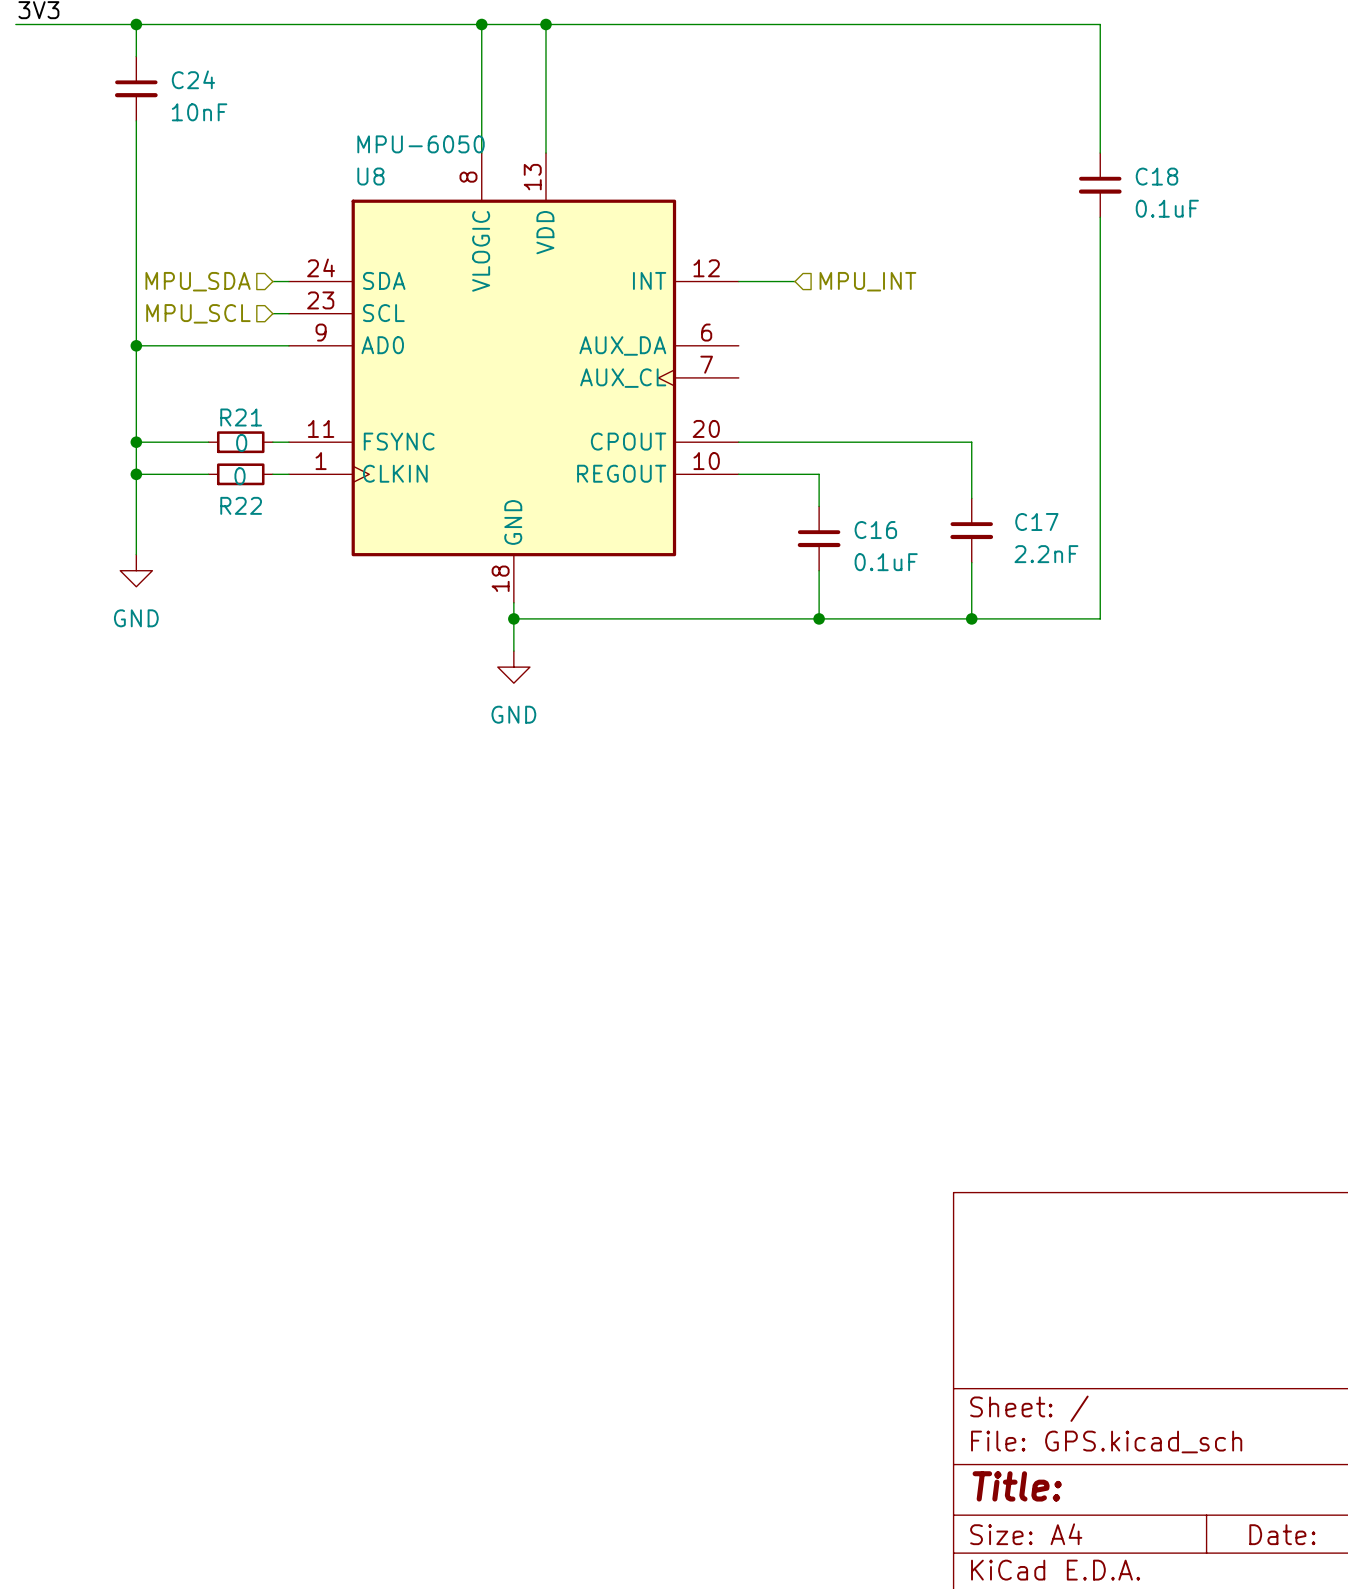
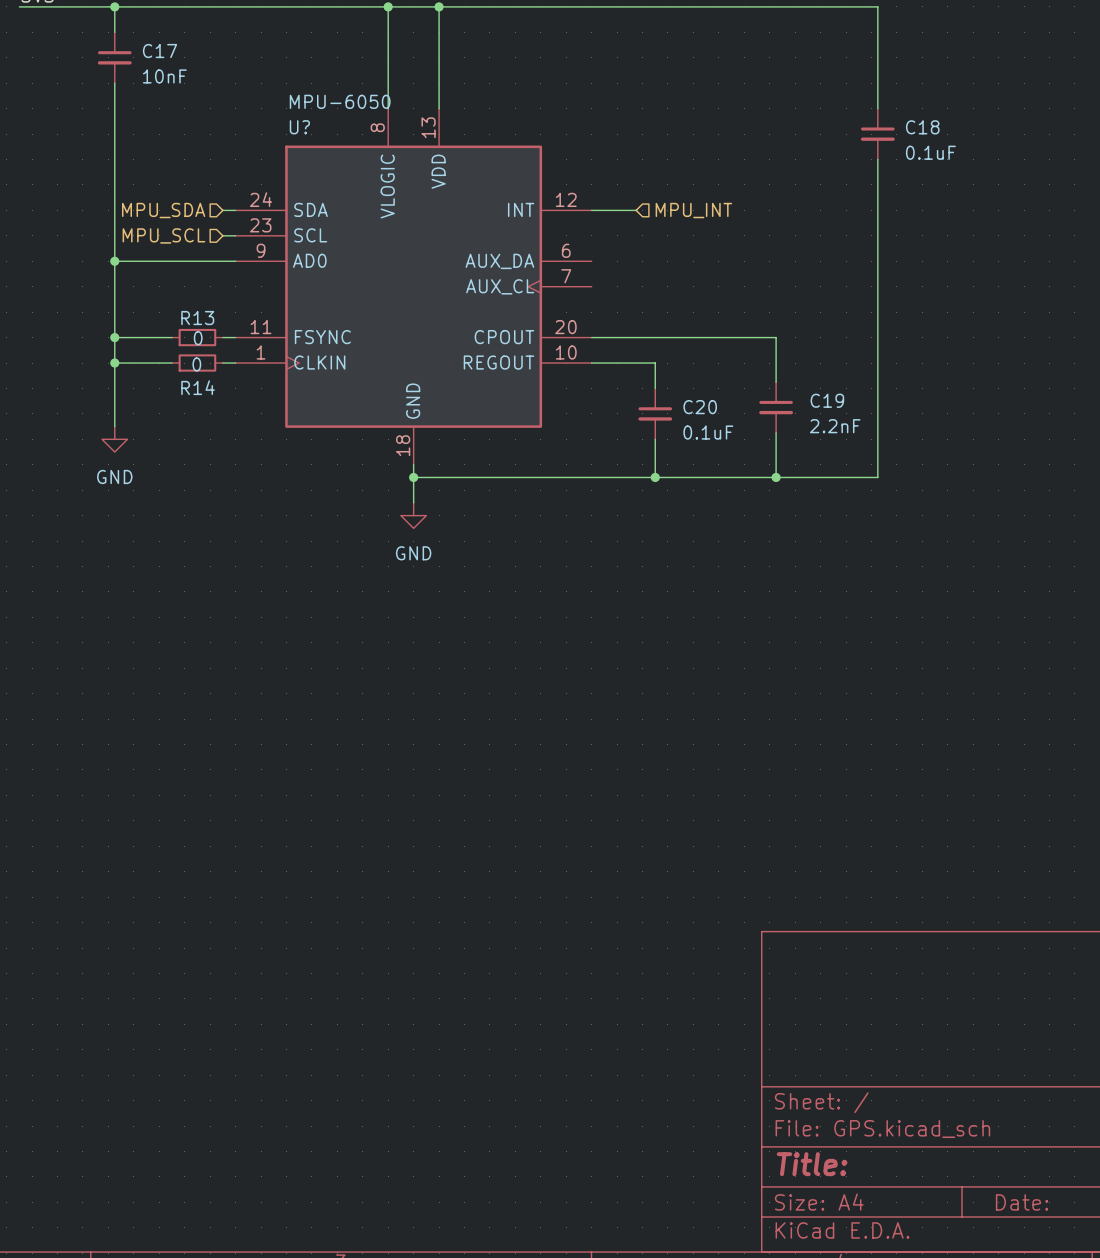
C24 name: C24 (193, 79) -> C17 (159, 51)
U8 name: U8 (370, 176) -> U? (299, 127)
R21 name: R21 (241, 417) -> R13 (197, 318)
R22 name: R22 (241, 505) -> R14 (198, 387)
C17 name: C17 (1036, 522) -> C19 (827, 400)
C16 name: C16 (875, 530) -> C20 (700, 407)

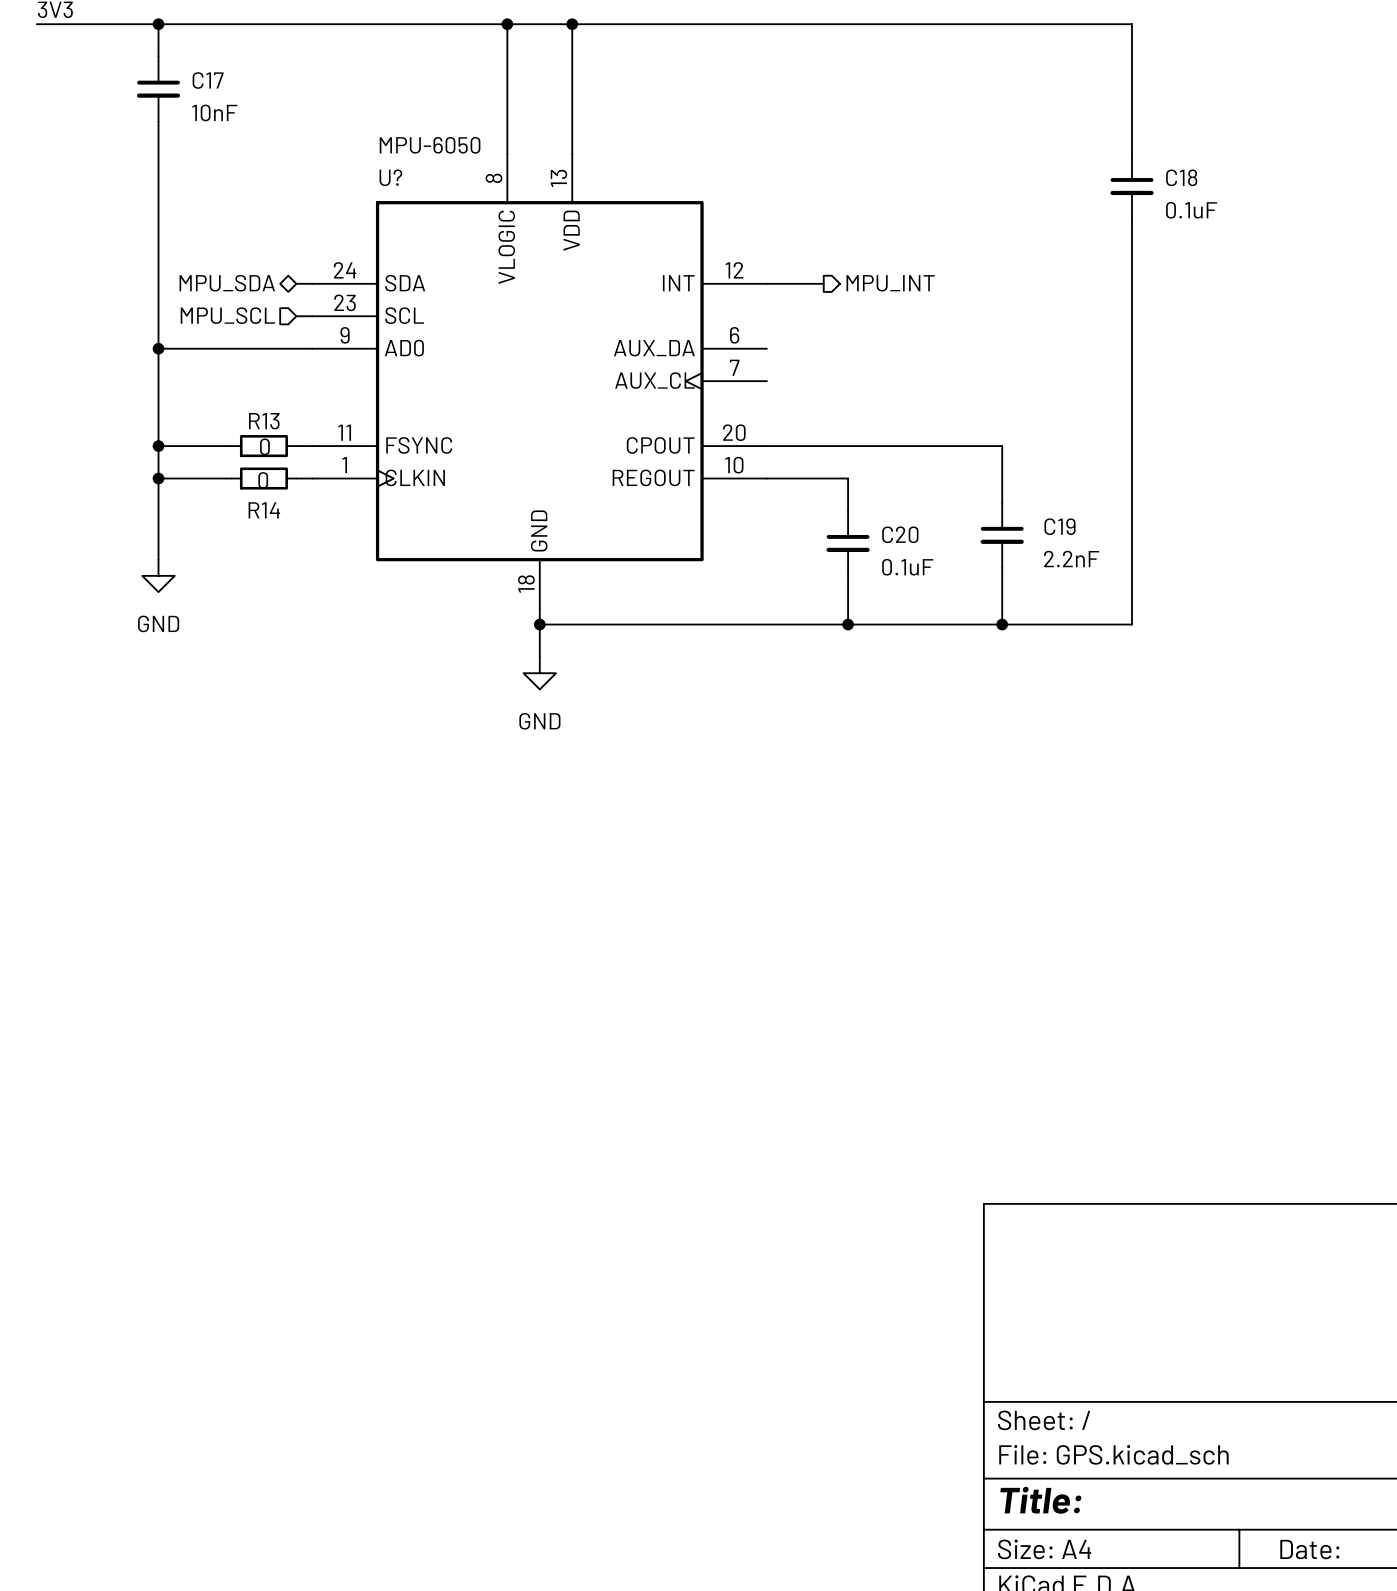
hierarchical label shape: input (163, 210) -> bidirectional (227, 283)
hierarchical label shape: input (693, 210) -> output (890, 283)

